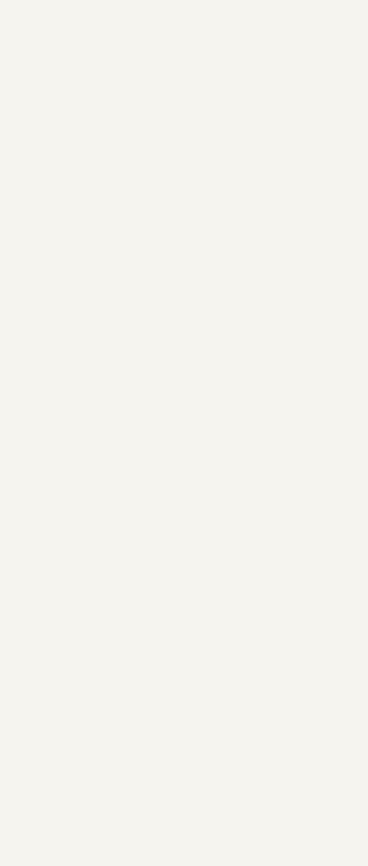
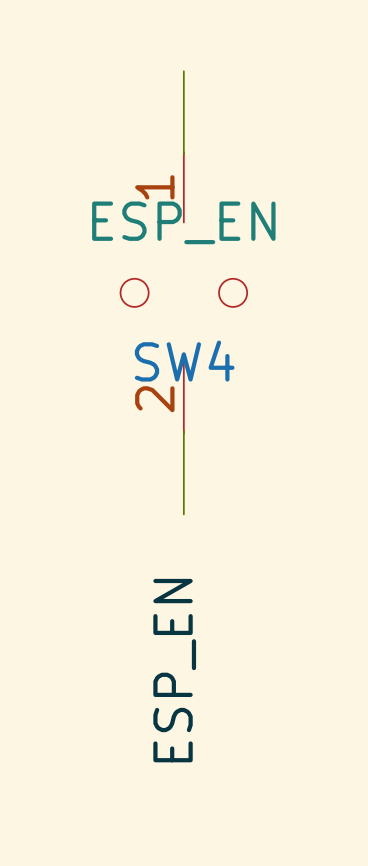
wire: none -> (183, 71) (183, 154)
SW4: none -> ESP_EN (183, 292)
wire: none -> (183, 431) (183, 514)
label: none -> ESP_EN (174, 670)

